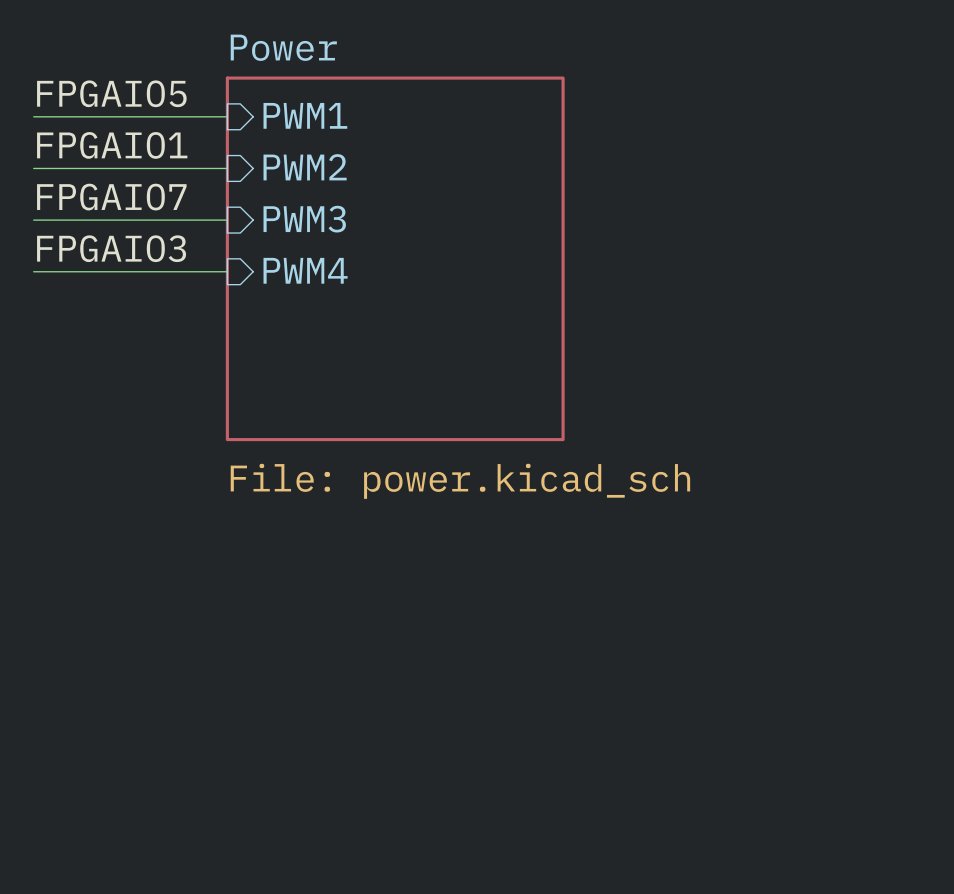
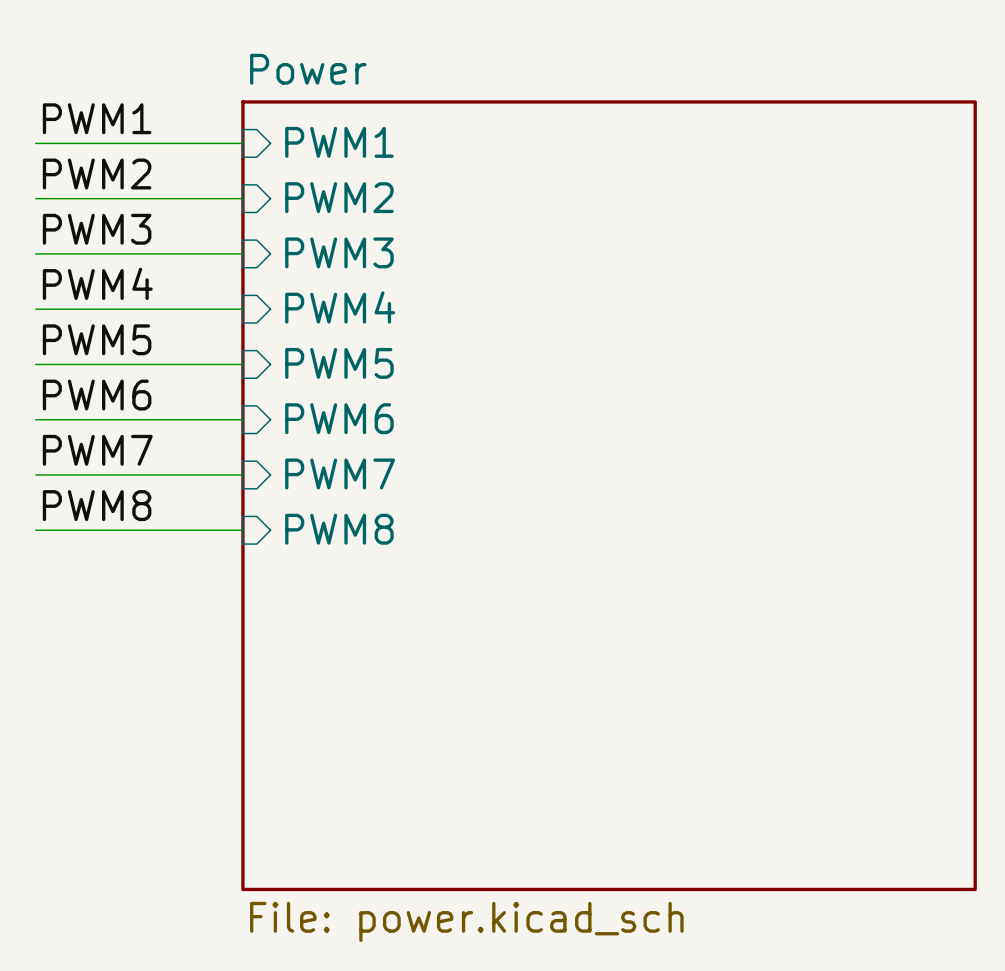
label: FPGAIO5 (111, 93) -> PWM1 (97, 118)
label: FPGAIO1 (112, 145) -> PWM2 (97, 174)
label: FPGAIO7 (111, 197) -> PWM3 (97, 229)
label: FPGAIO3 (111, 248) -> PWM4 (97, 283)
sheet Power: File: power.kicad_sch (395, 258) -> none
label: none -> PWM5 (97, 339)
sheet pin: none -> PWM5 (339, 363)
wire: none -> (35, 364) (242, 364)
label: none -> PWM6 (97, 395)
sheet pin: none -> PWM6 (339, 418)
wire: none -> (35, 419) (242, 419)
label: none -> PWM7 (97, 450)
sheet pin: none -> PWM7 (340, 473)
wire: none -> (35, 474) (242, 474)
sheet Power: none -> File: power.kicad_sch (609, 495)
label: none -> PWM8 (97, 505)
sheet pin: none -> PWM8 (339, 529)
wire: none -> (35, 530) (242, 530)

